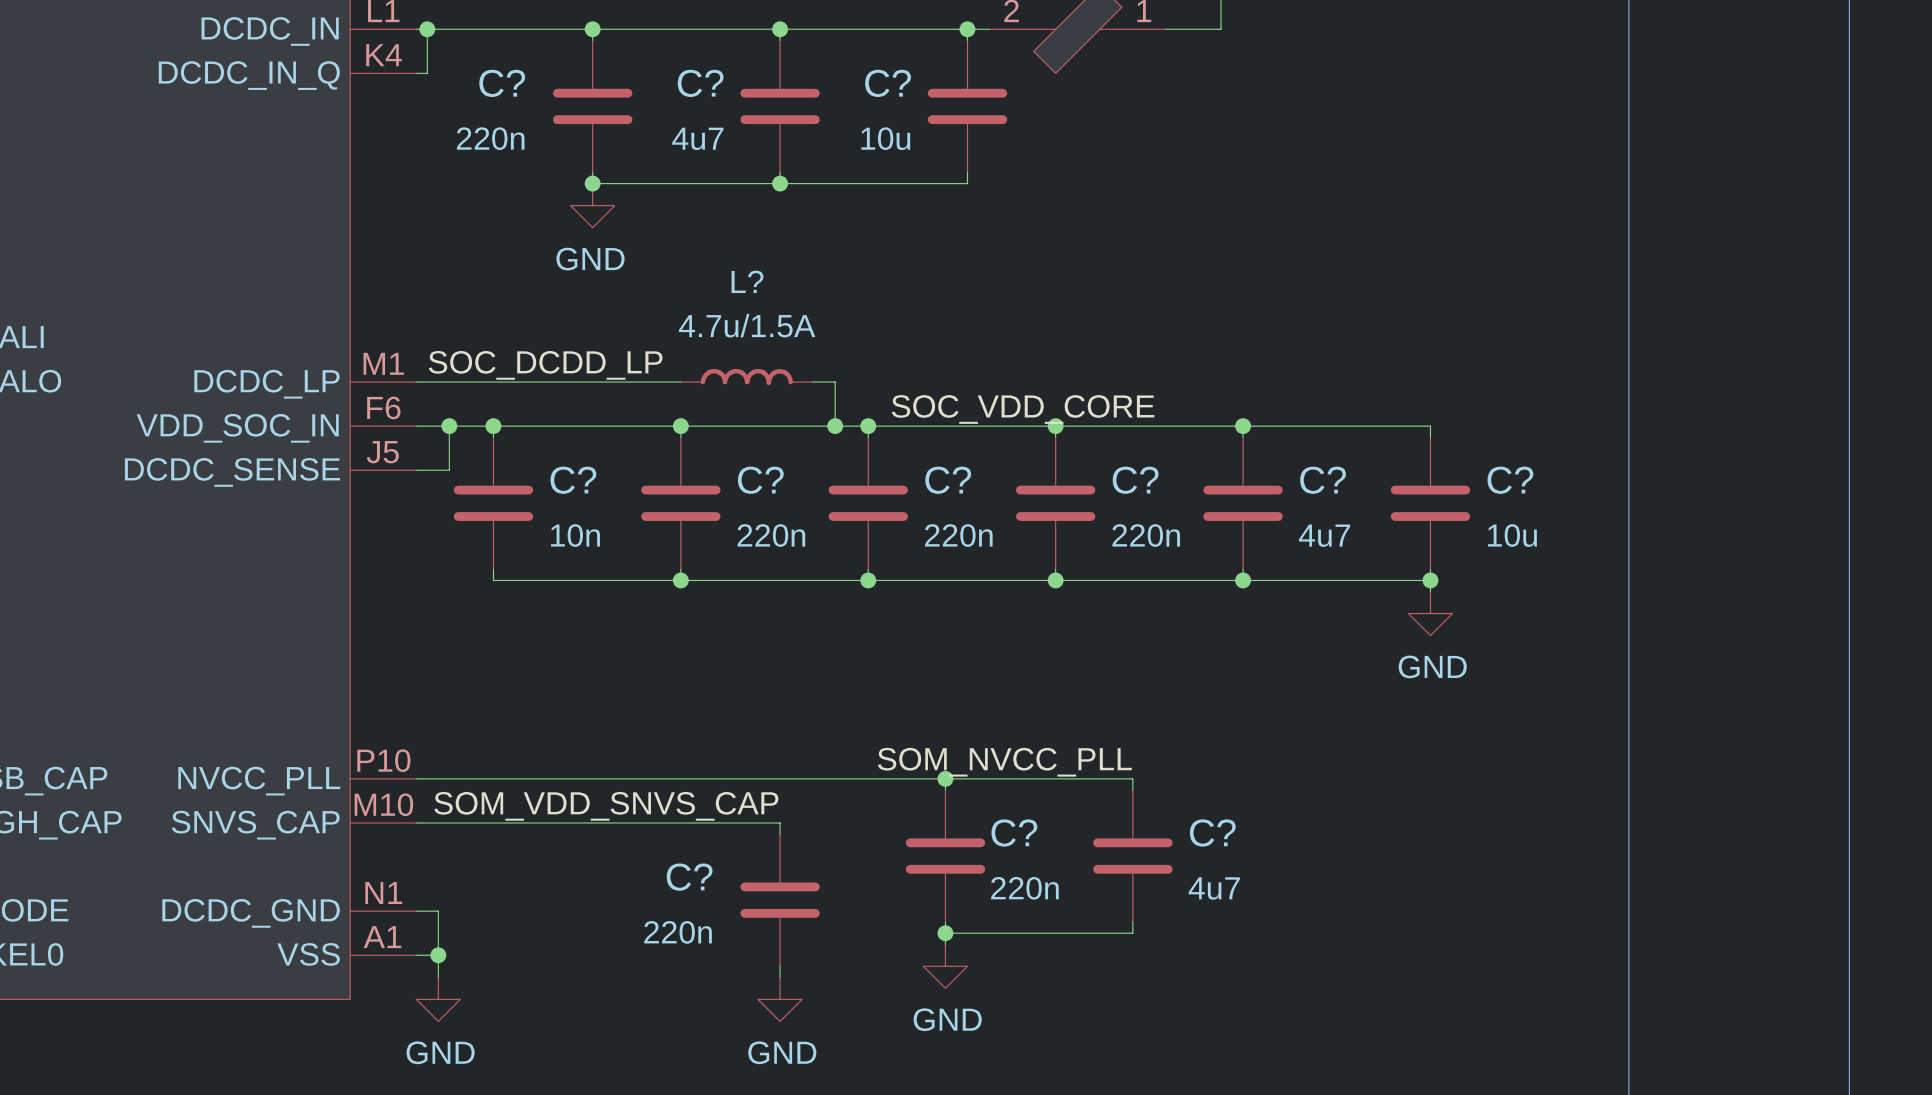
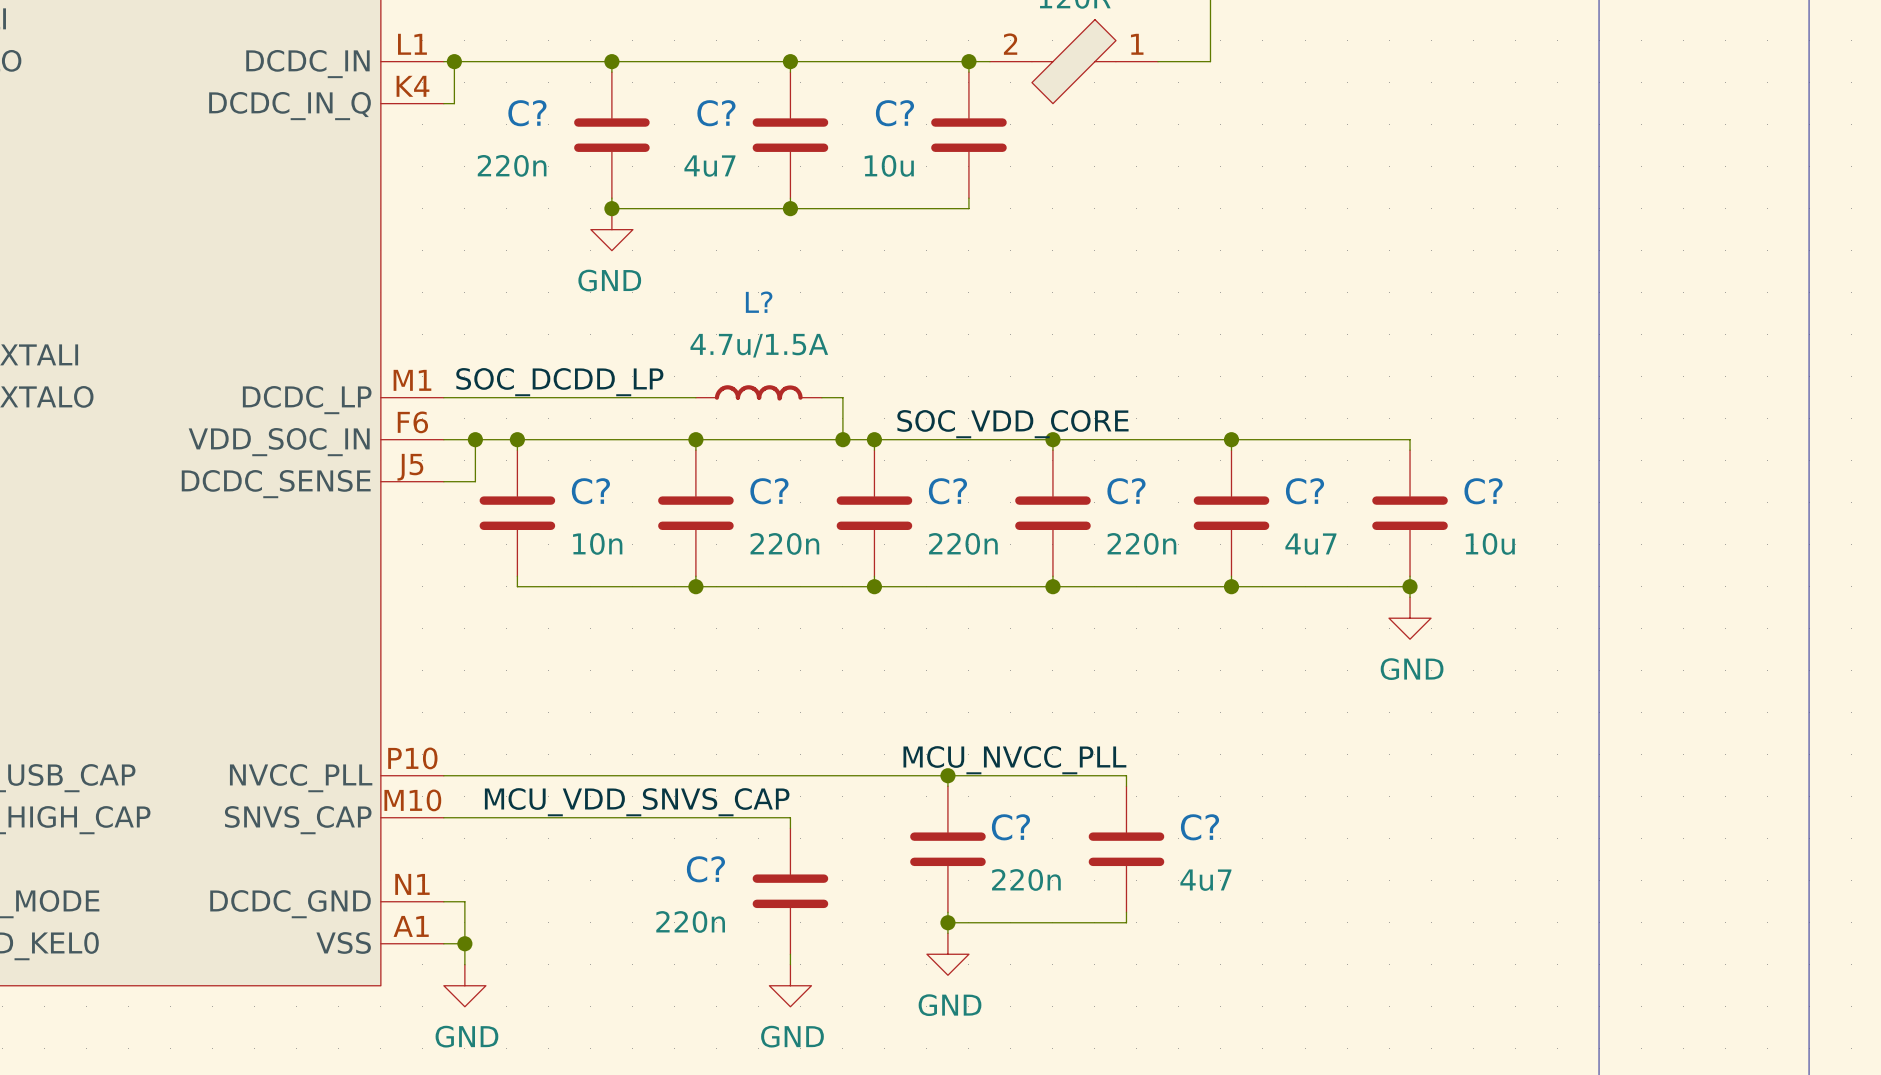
label: SOM_NVCC_PLL (1004, 762) -> MCU_NVCC_PLL (1014, 760)
label: SOM_VDD_SNVS_CAP (606, 806) -> MCU_VDD_SNVS_CAP (637, 802)

